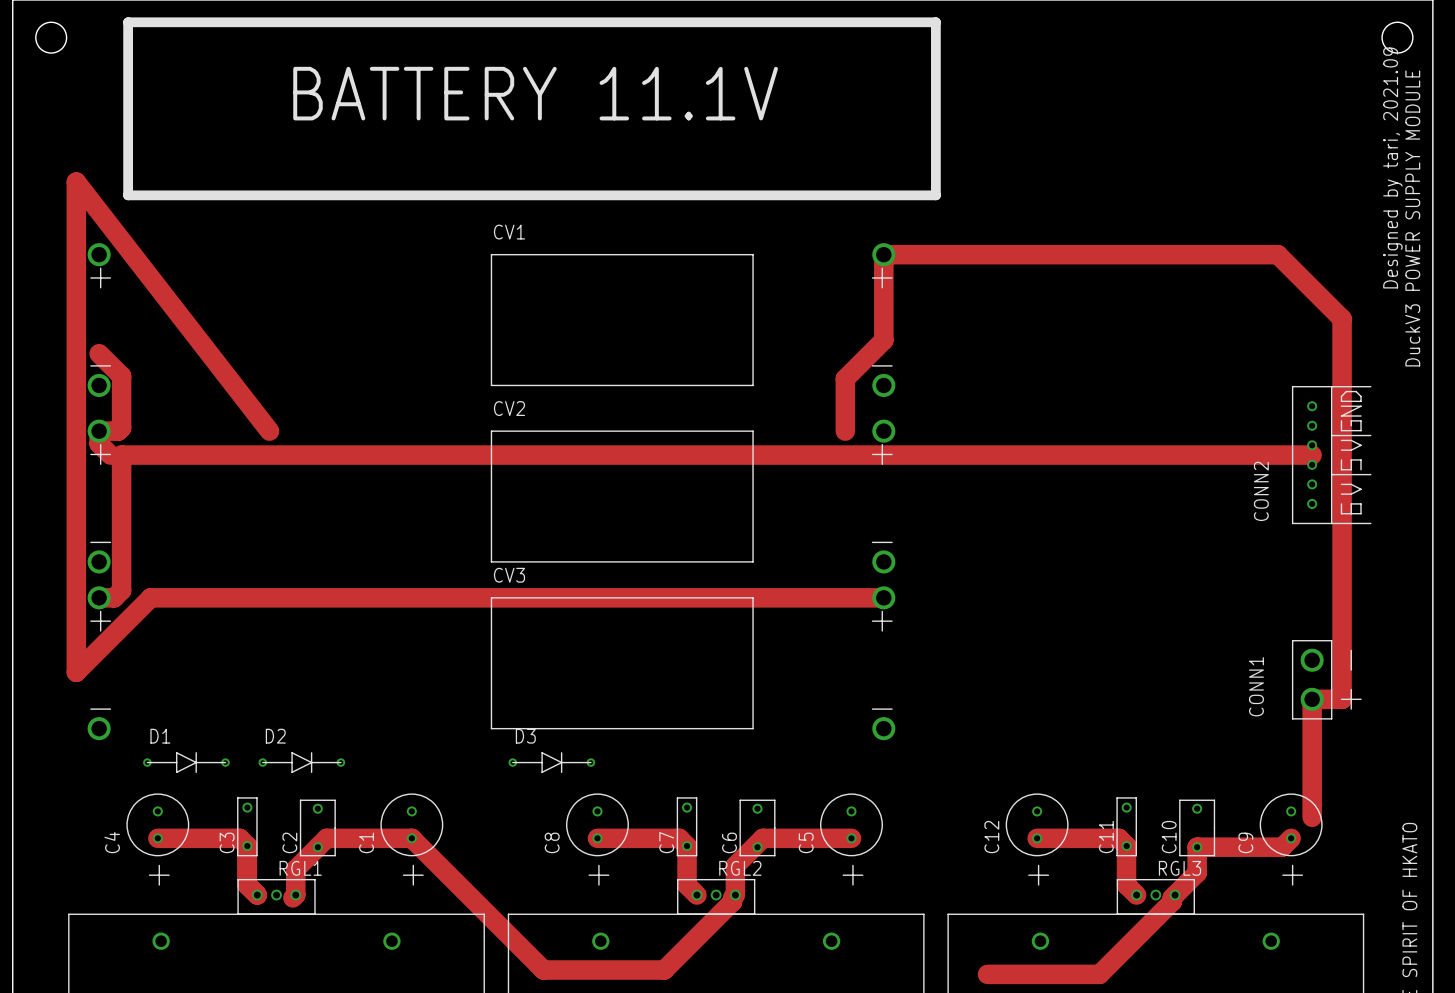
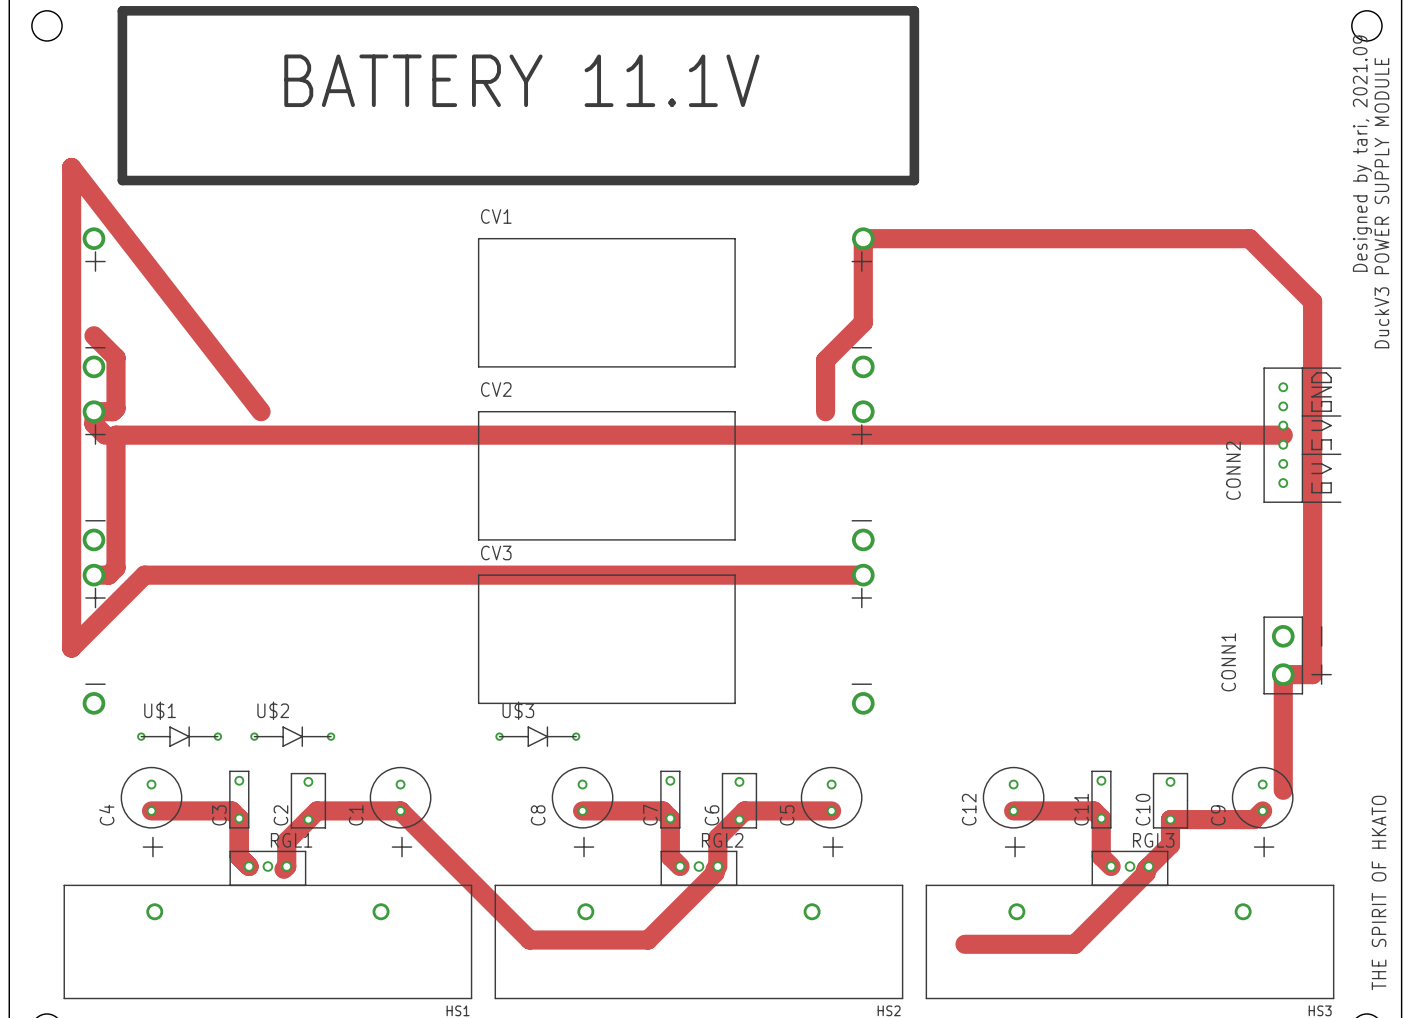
D1 name: D1 (160, 736) -> U$1 (160, 710)
D2 name: D2 (275, 736) -> U$2 (273, 710)
D3 name: D3 (525, 736) -> U$3 (518, 710)

